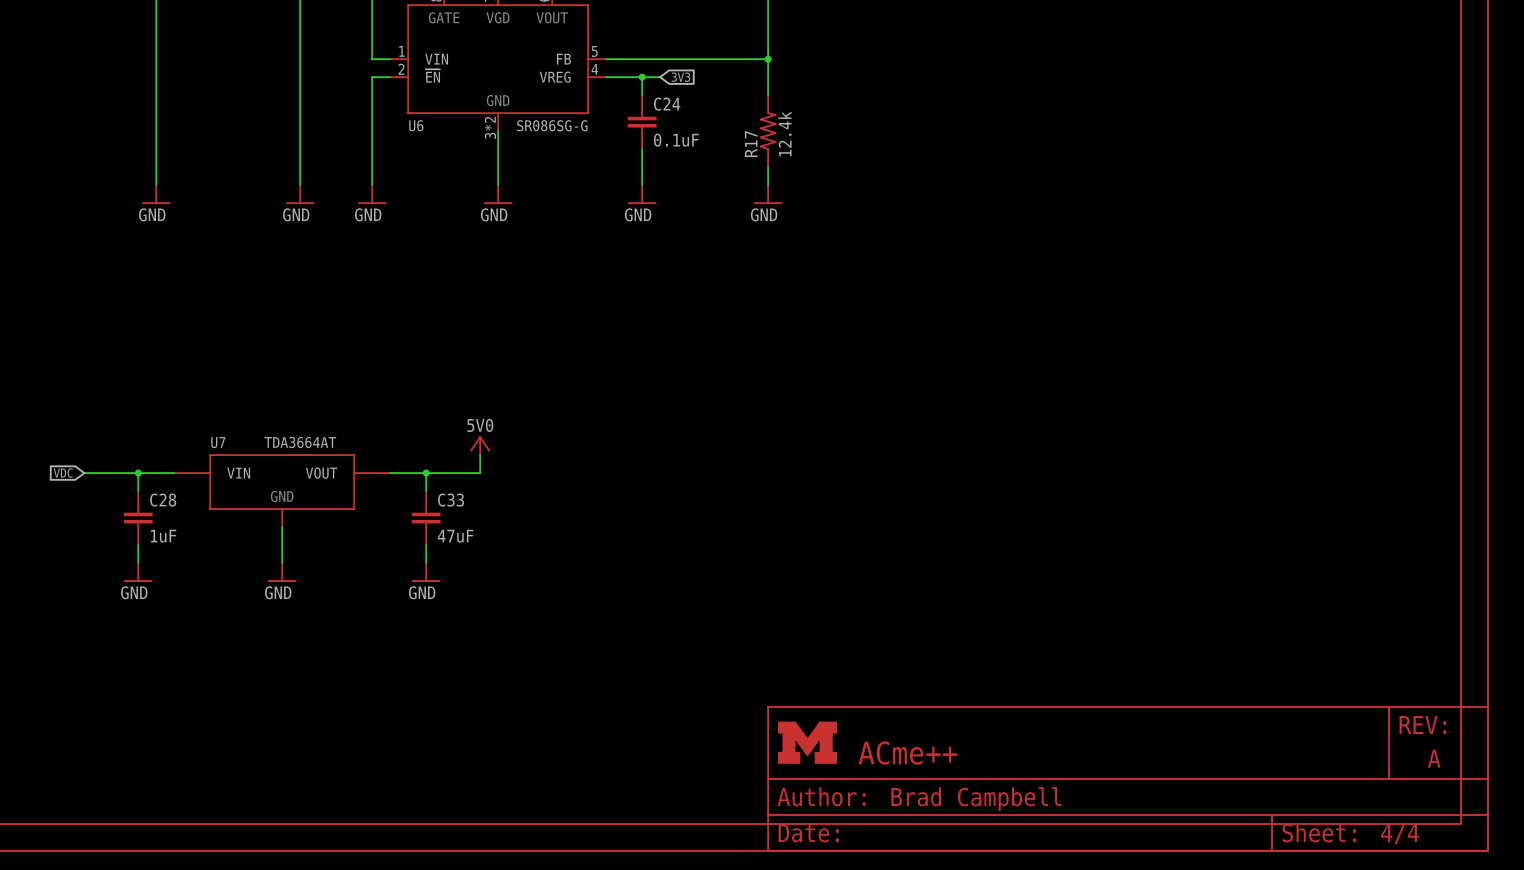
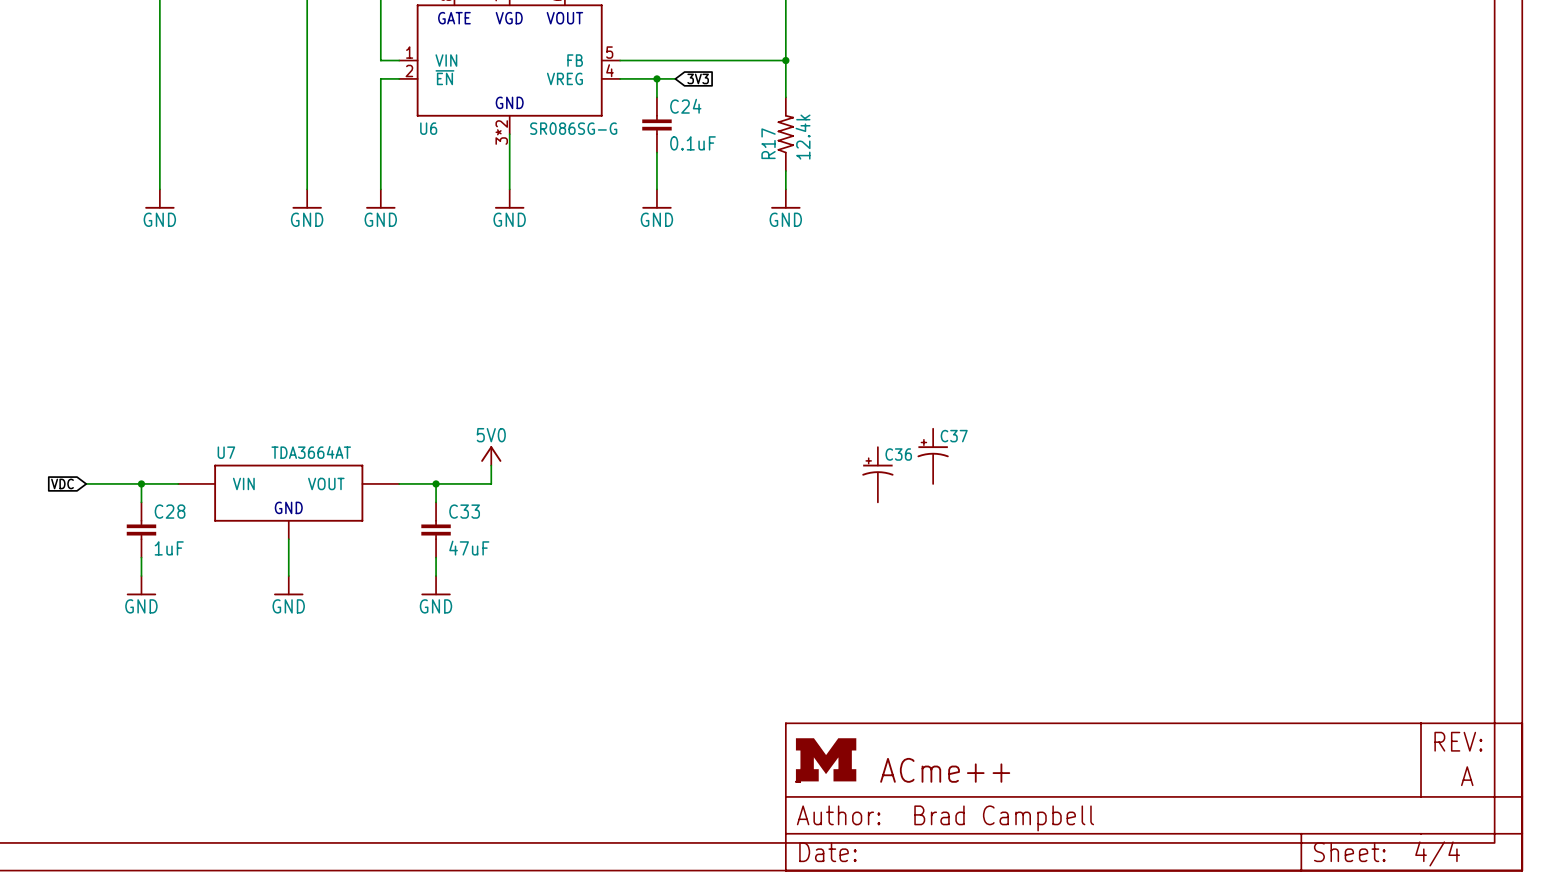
C37: none -> (933, 456)
C36: none -> (877, 474)

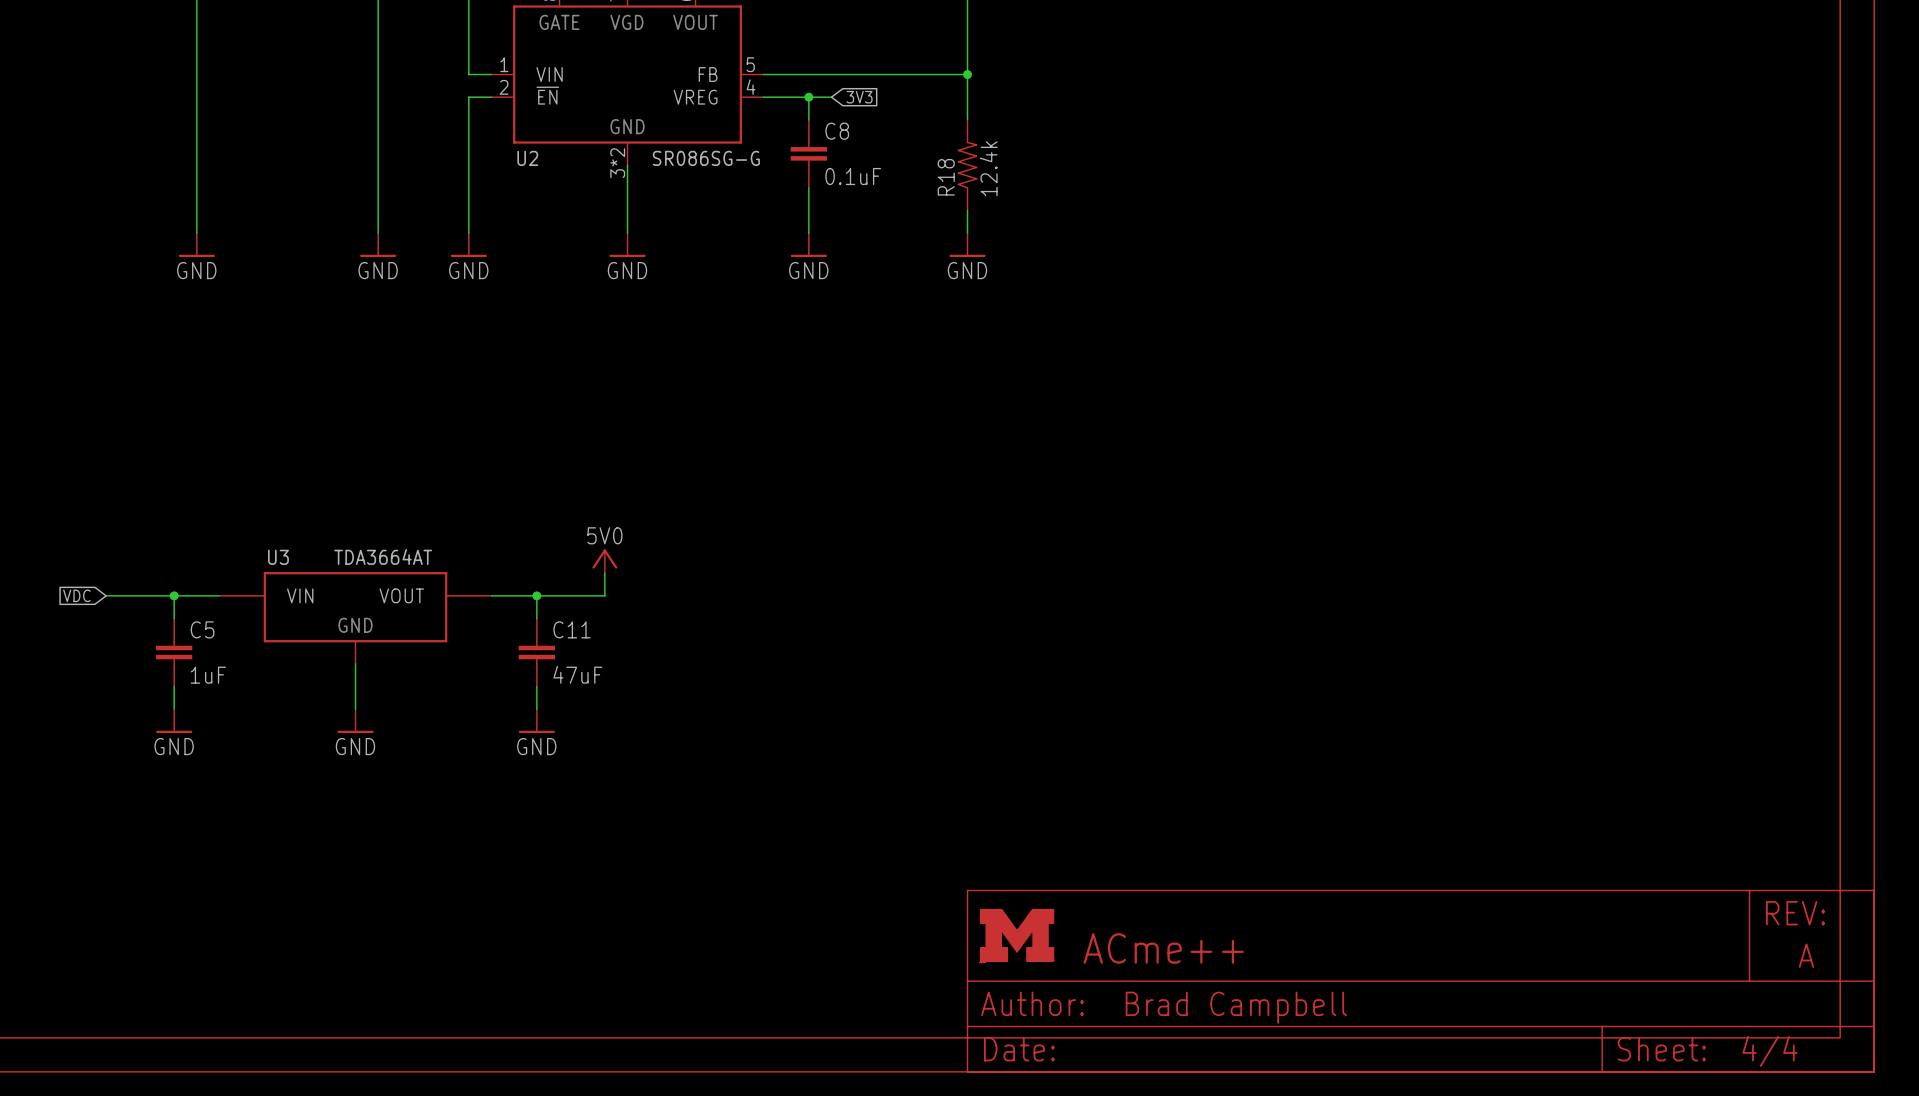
C24 name: C24 (685, 106) -> C8 (837, 131)
U6 name: U6 (428, 128) -> U2 (527, 158)
R17 name: R17 (768, 143) -> R18 (946, 177)
U7 name: U7 (226, 452) -> U3 (278, 557)
C37: (933, 456) -> none
C36: (877, 474) -> none
C28 name: C28 (170, 511) -> C5 (202, 629)
C33 name: C33 (464, 511) -> C11 (572, 629)

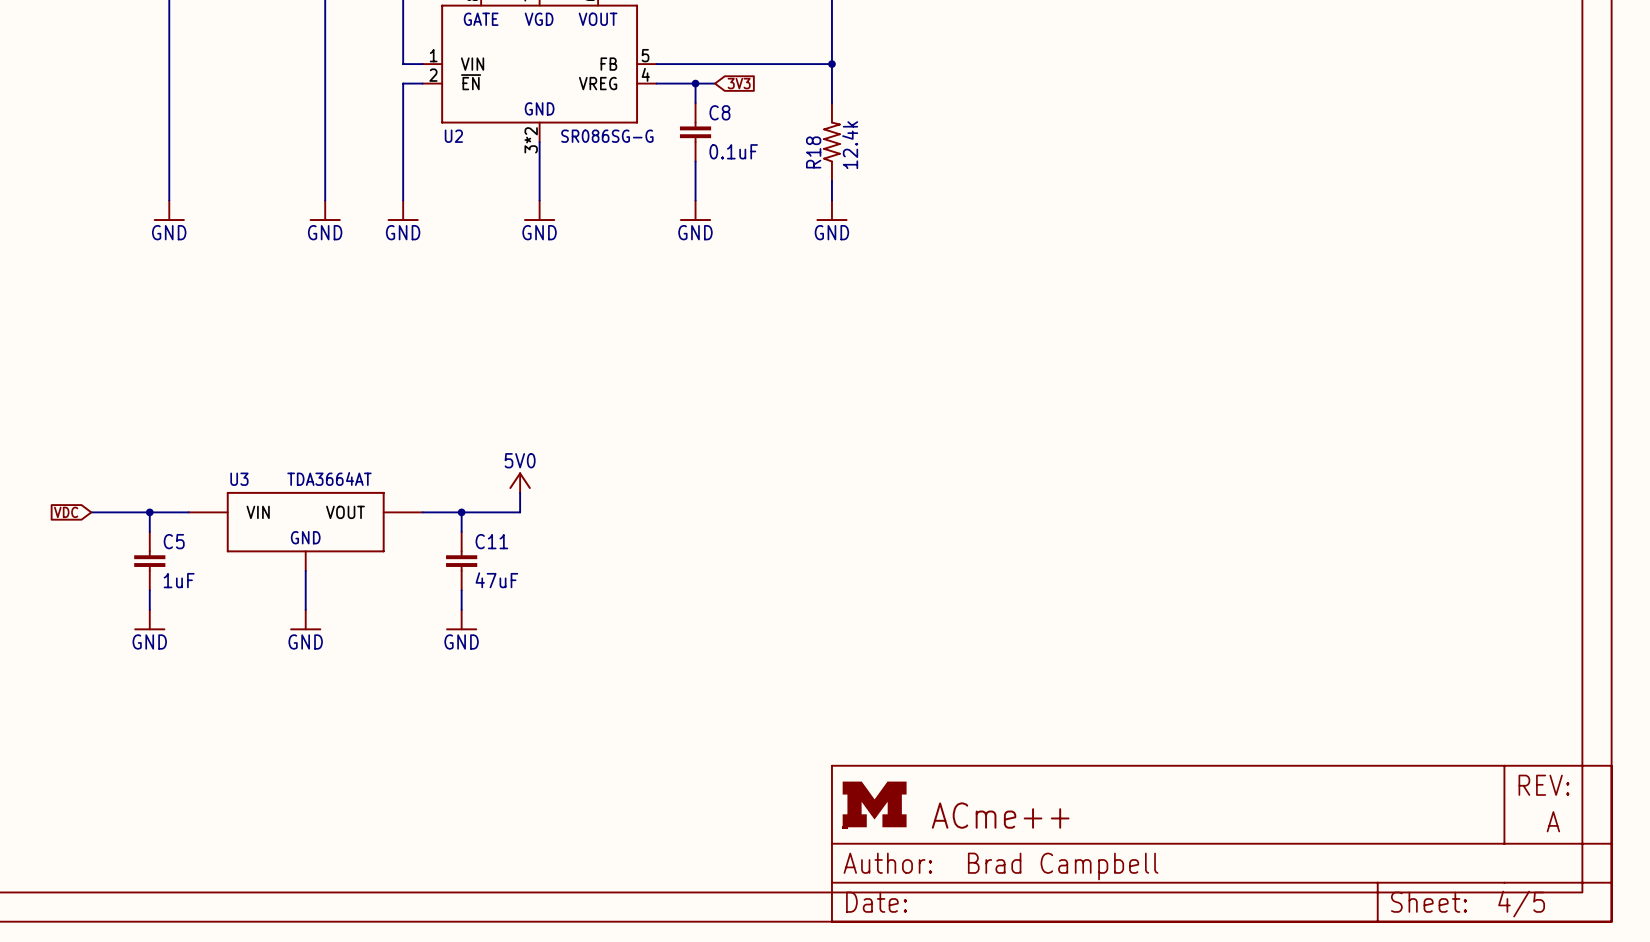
part text: 4/4 (1769, 1051) -> 4/5 (1521, 904)

